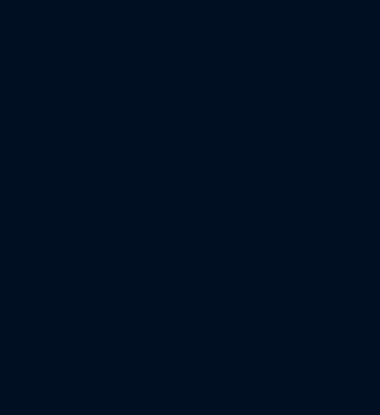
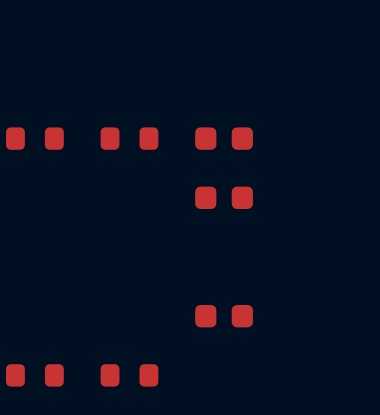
part: none -> (34, 138)
part: none -> (129, 138)
part: none -> (224, 138)
part: none -> (224, 197)
part: none -> (224, 316)
part: none -> (34, 375)
part: none -> (129, 375)

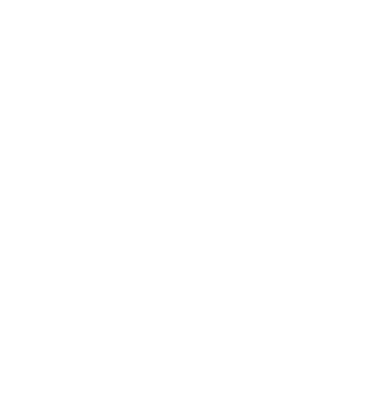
part: (34, 138) -> none
part: (129, 138) -> none
part: (224, 138) -> none
part: (224, 197) -> none
part: (224, 316) -> none
part: (34, 375) -> none
part: (129, 375) -> none

